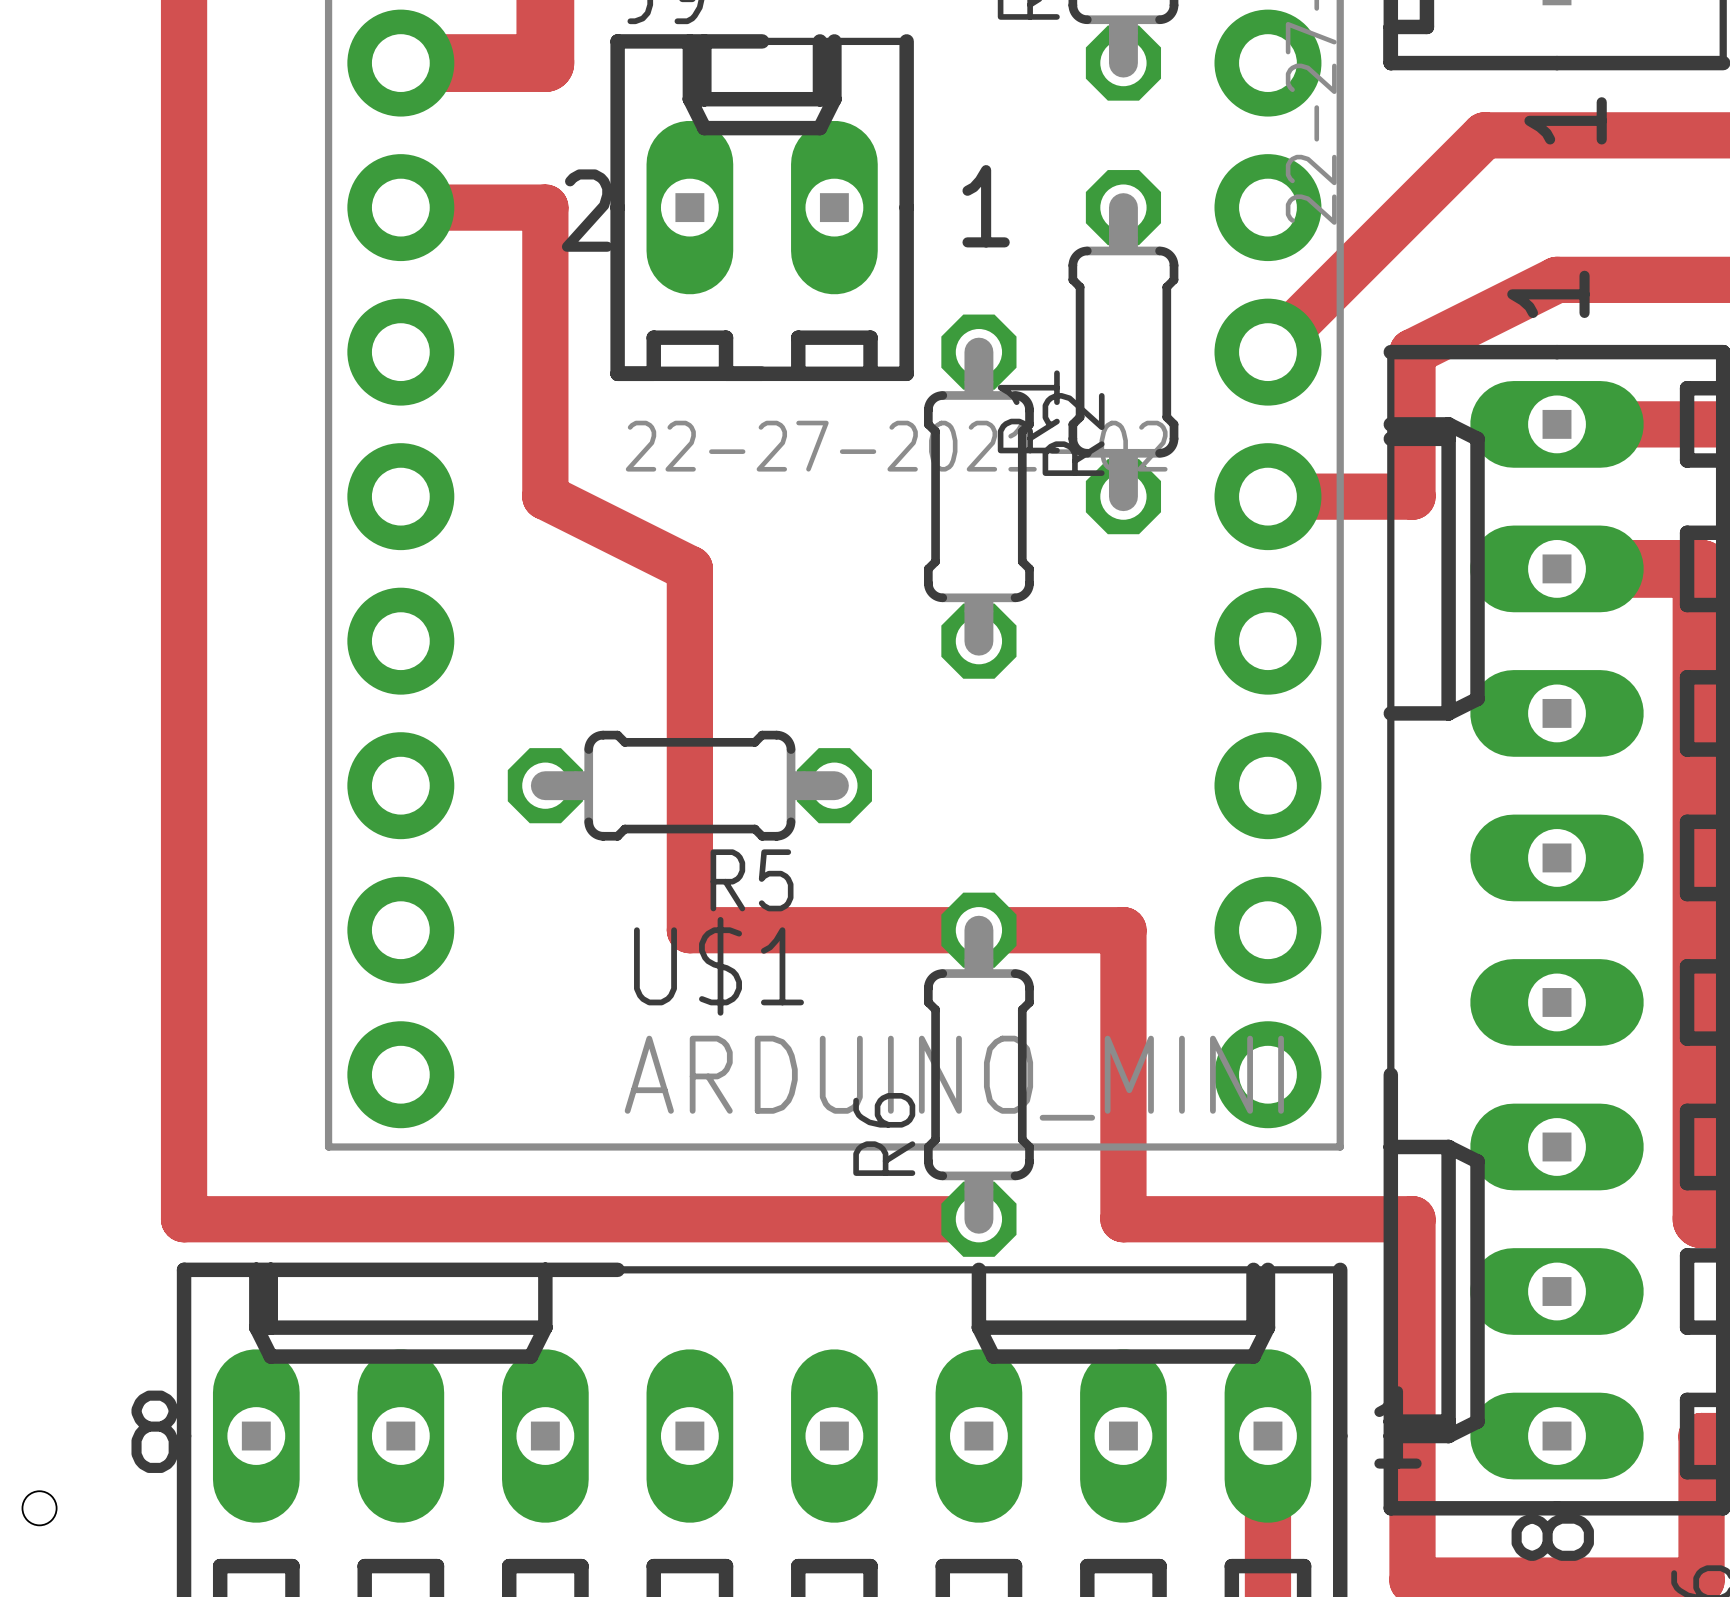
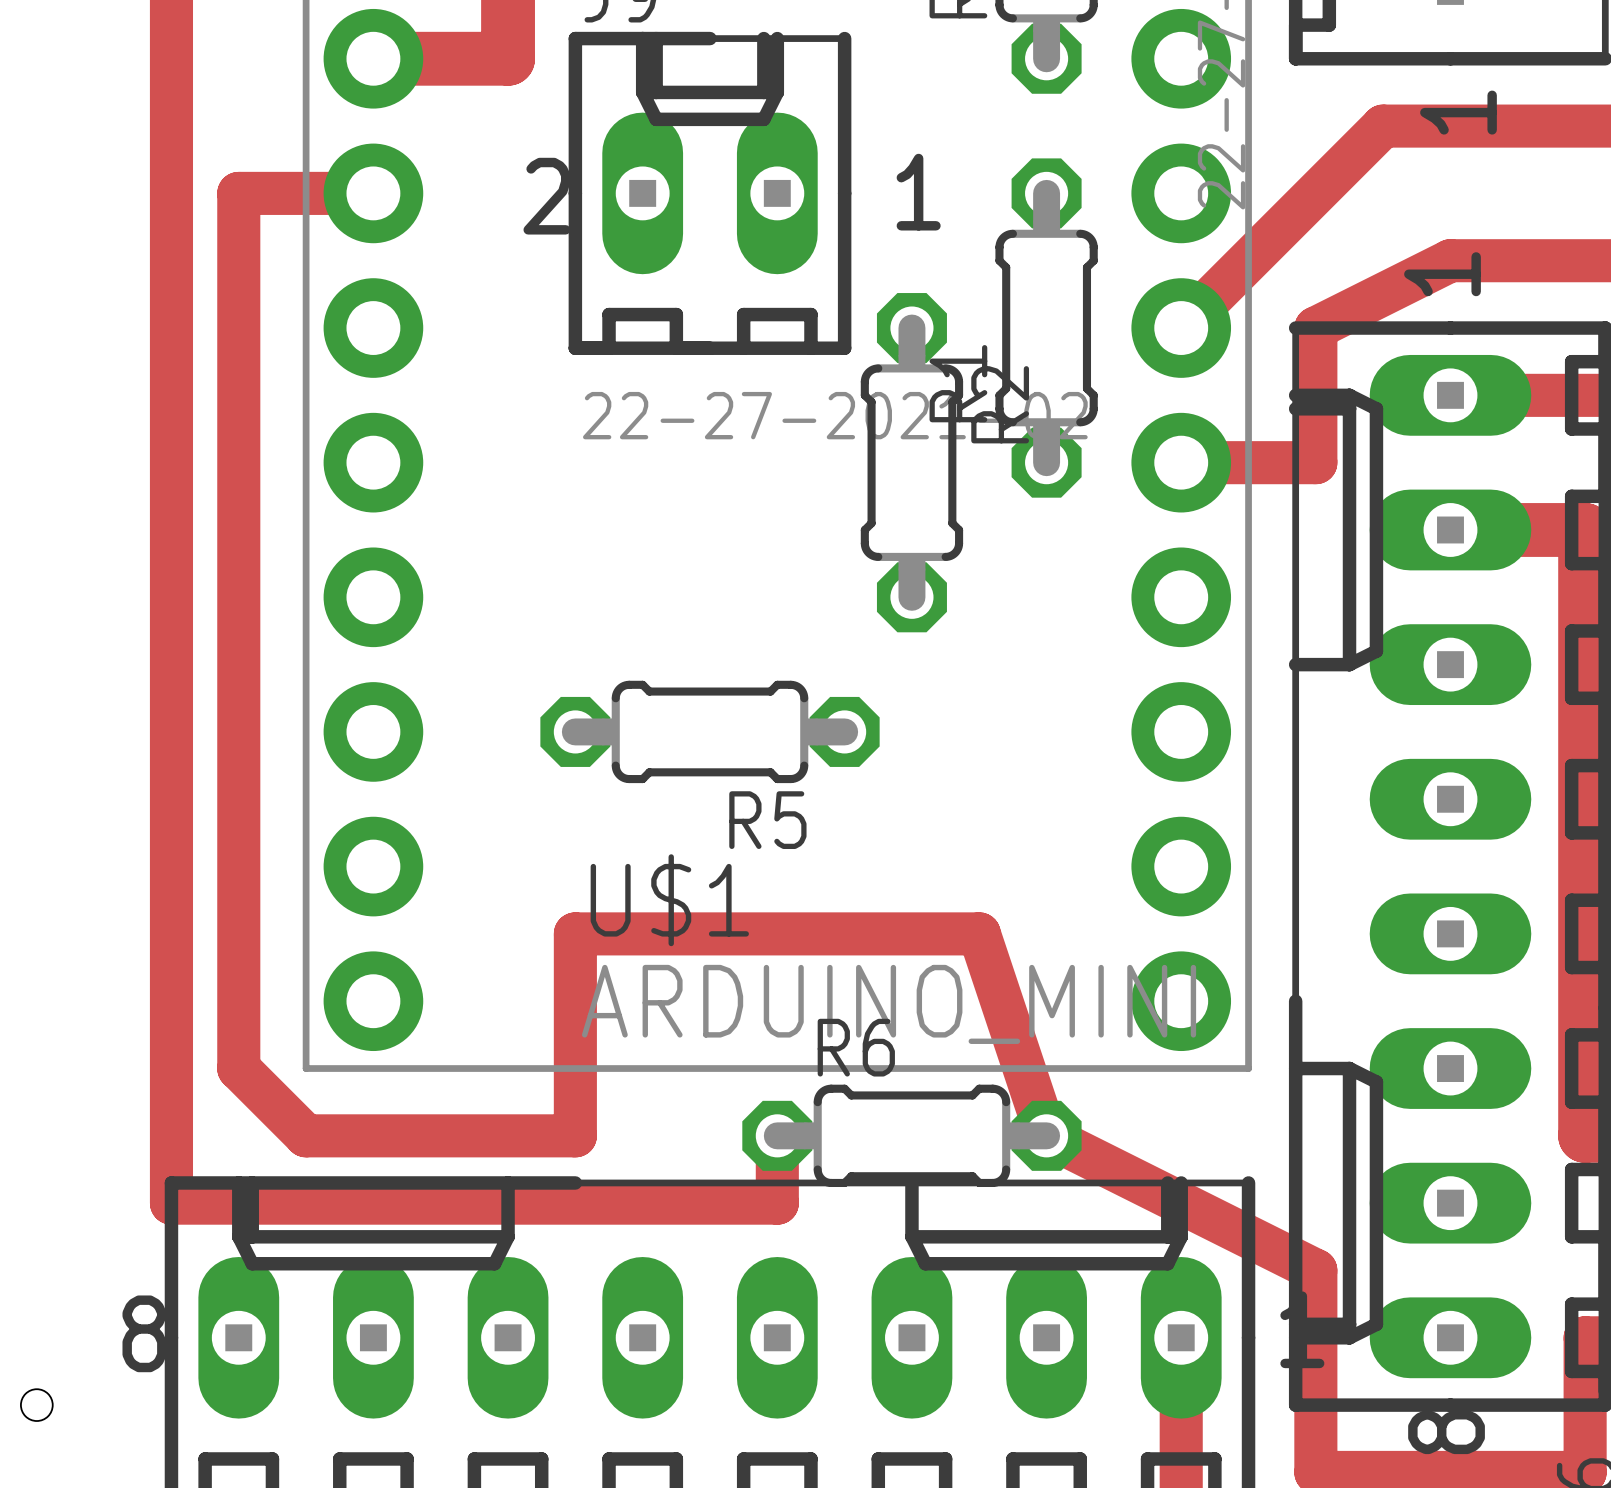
track: (400, 207) (545, 207) (545, 496) (689, 568) (689, 930) (1123, 930) (1123, 1219) (1412, 1219) (1412, 1363) -> (373, 193) (238, 193) (238, 1068) (306, 1135)
R5 position: (689, 785) -> (710, 731)
R6 rotation: 0° (978, 1074) -> 90° clockwise (911, 1135)
track: (184, 1219) (328, 1219) -> (171, 1135) (171, 1203) (777, 1203) (777, 1135)
track: (617, 1219) (978, 1219) -> (575, 1135) (575, 933) (979, 933) (1046, 1135) (1315, 1270)

